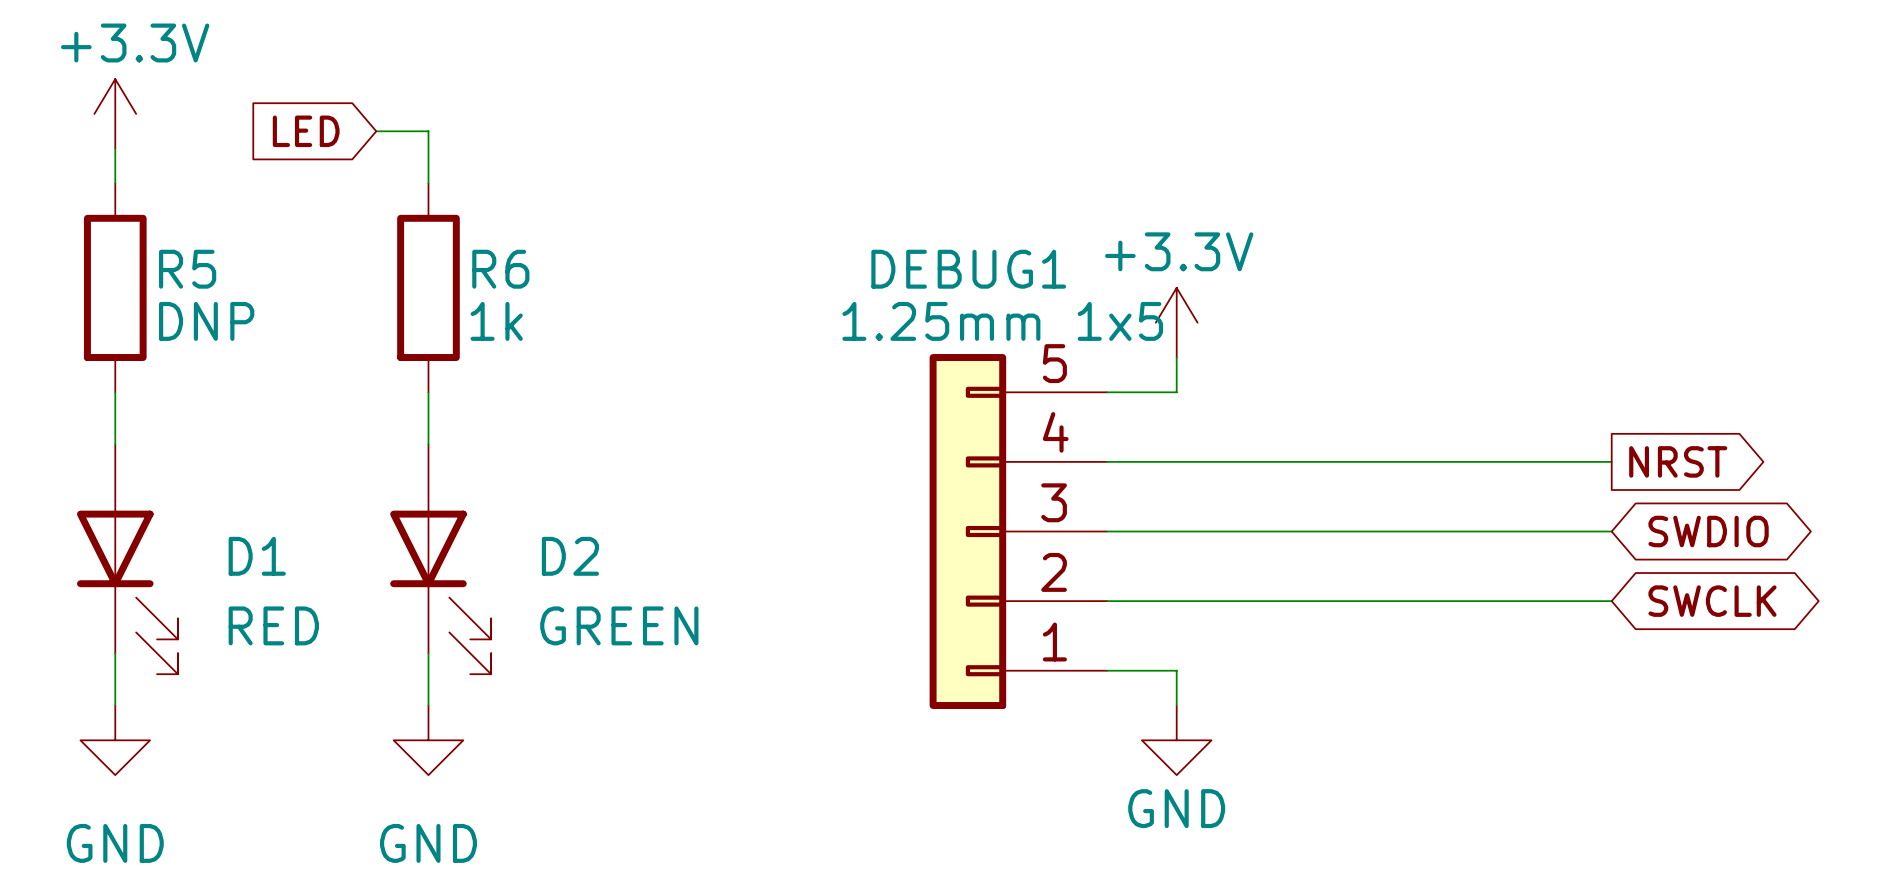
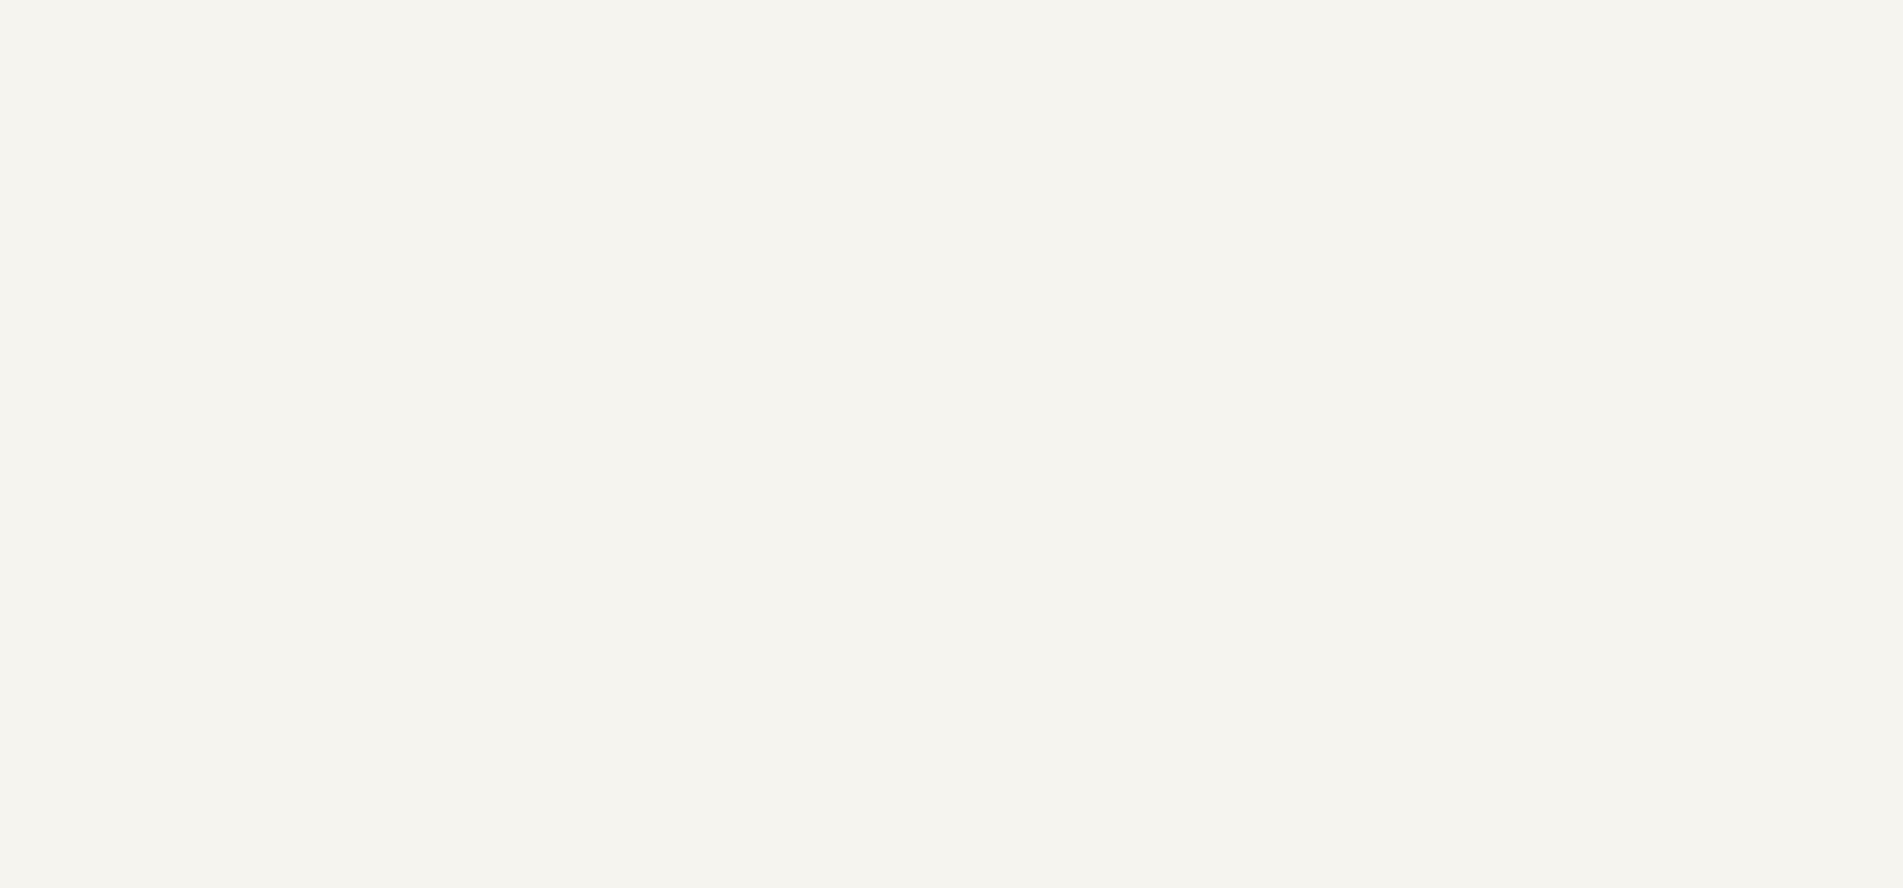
power symbol: +3.3V (115, 113) -> none
global label: LED (306, 131) -> none
wire: (376, 131) (428, 131) (428, 183) -> none
wire: (115, 148) (115, 183) -> none
R5: DNP (115, 287) -> none
R6: 1k (428, 287) -> none
power symbol: +3.3V (1176, 322) -> none
wire: (1176, 357) (1176, 392) (1107, 392) -> none
wire: (115, 392) (115, 444) -> none
wire: (428, 392) (428, 444) -> none
wire: (1107, 461) (1611, 461) -> none
global label: NRST (1678, 461) -> none
DEBUG1: 1.25mm 1x5 (1018, 531) -> none
wire: (1107, 531) (1611, 531) -> none
global label: SWDIO (1708, 531) -> none
D1: RED (127, 559) -> none
D2: GREEN (440, 559) -> none
wire: (1107, 601) (1611, 601) -> none
global label: SWCLK (1712, 601) -> none
wire: (115, 653) (115, 705) -> none
wire: (428, 653) (428, 705) -> none
wire: (1107, 670) (1176, 670) (1176, 705) -> none
power symbol: GND (115, 740) -> none
power symbol: GND (428, 740) -> none
power symbol: GND (1176, 740) -> none

